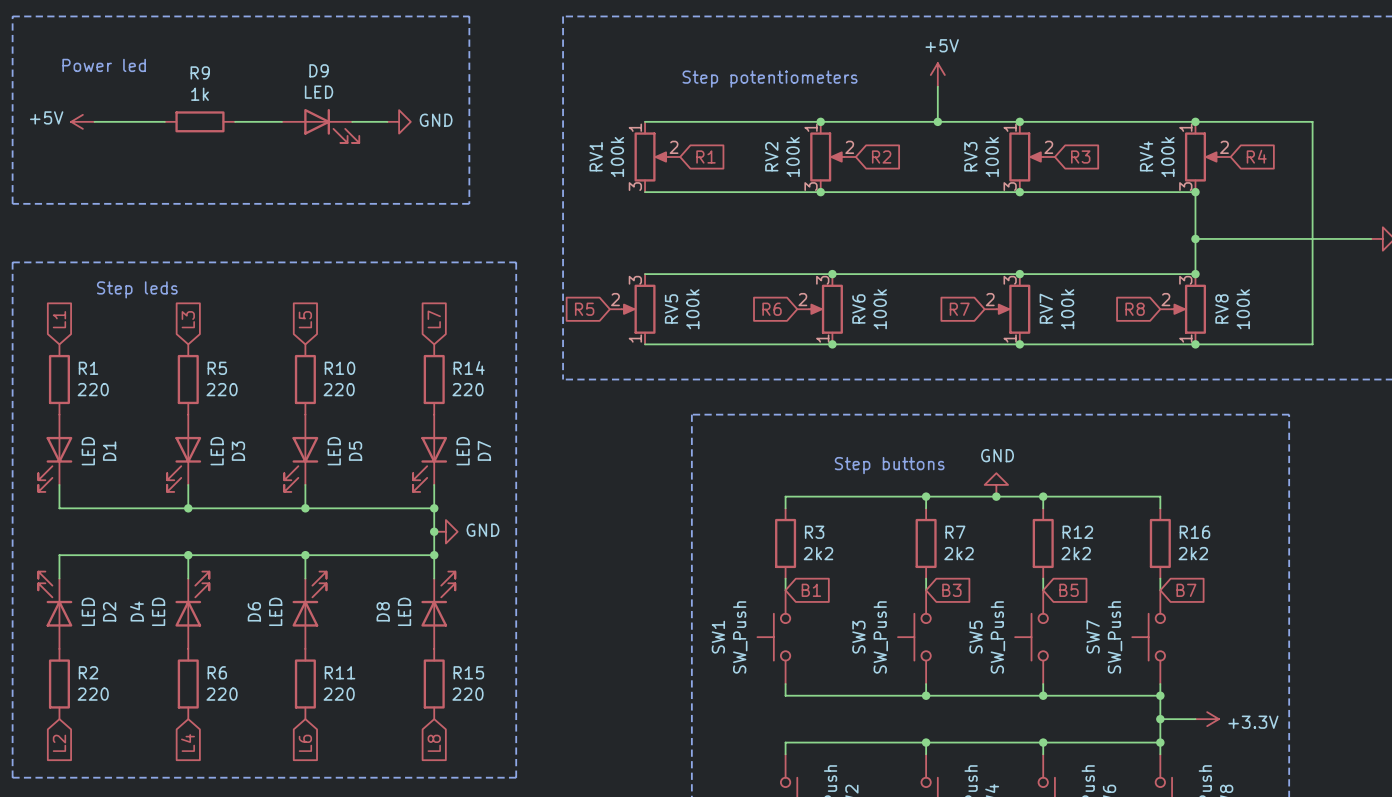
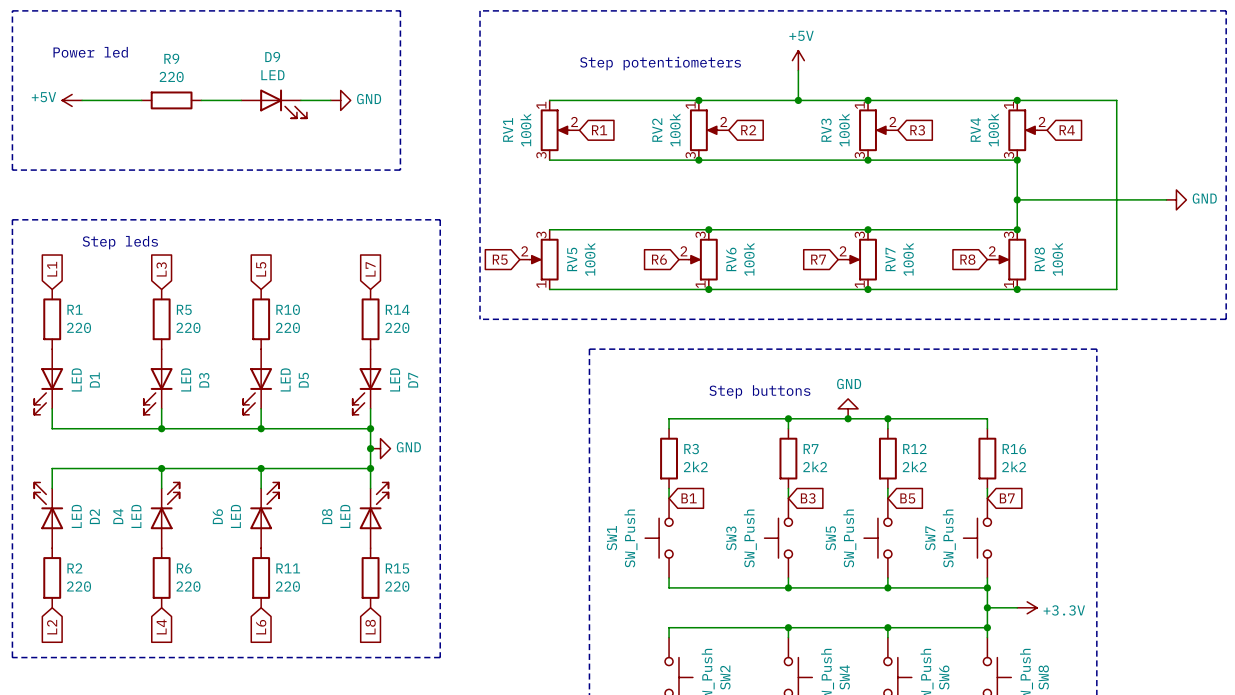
R9 value: 1k (199, 94) -> 220 (171, 76)

